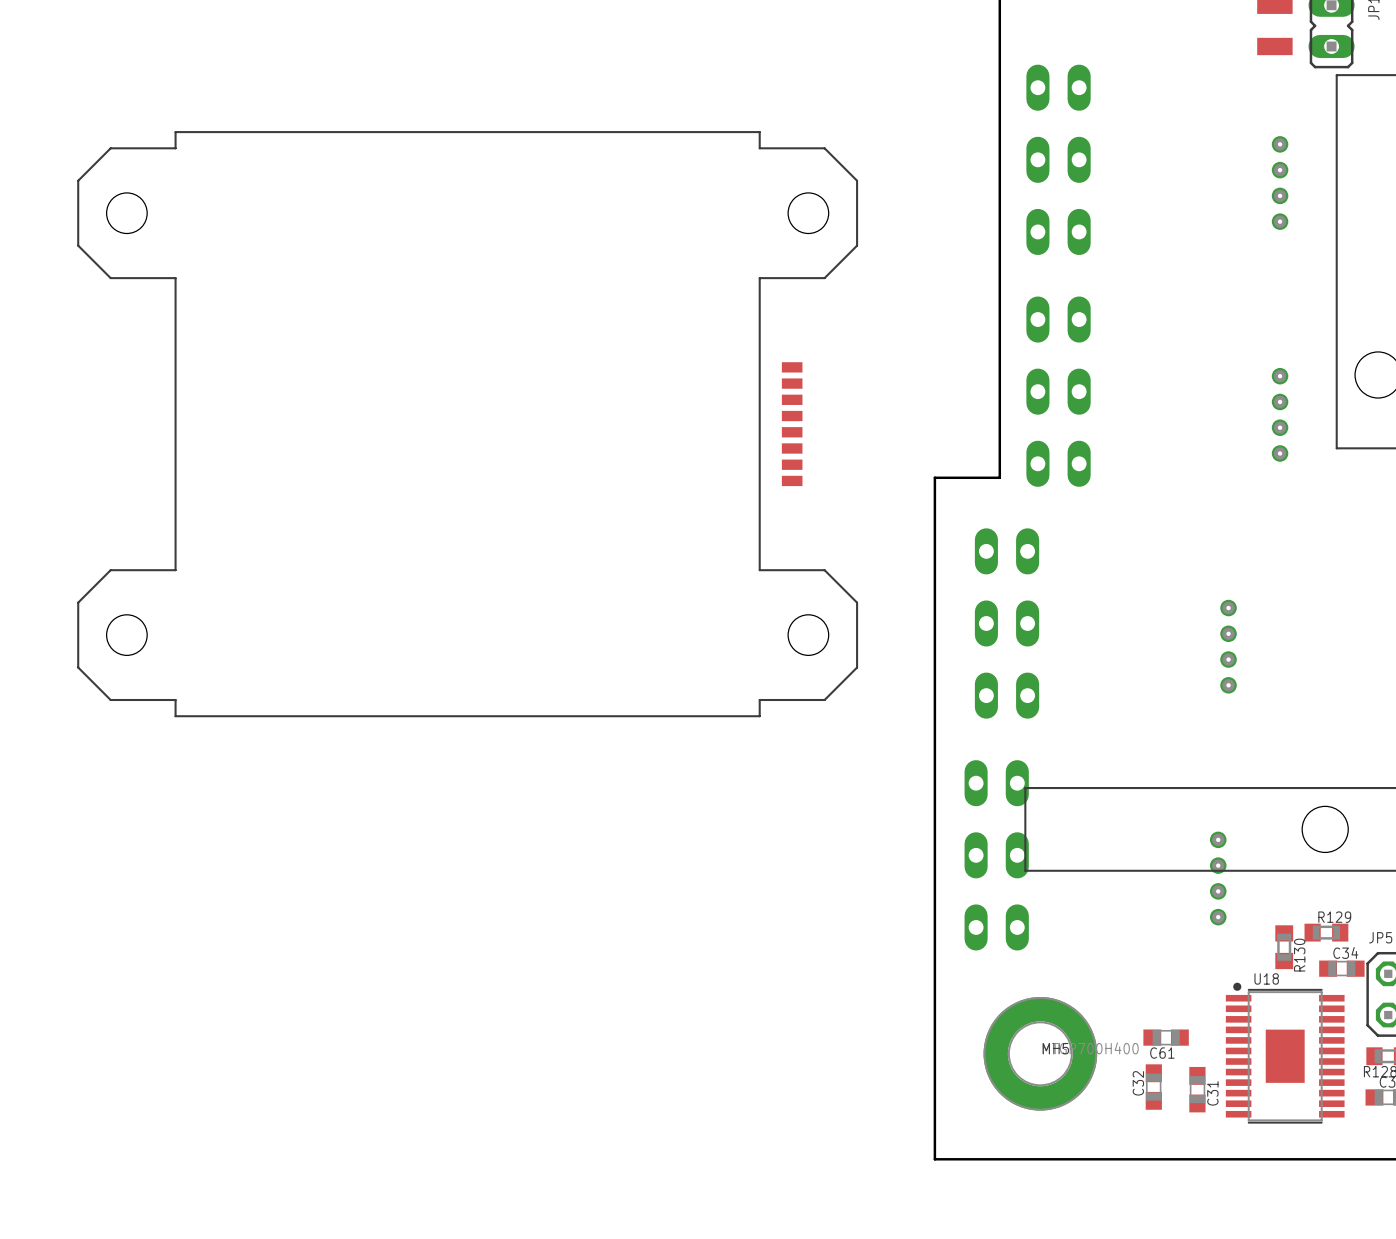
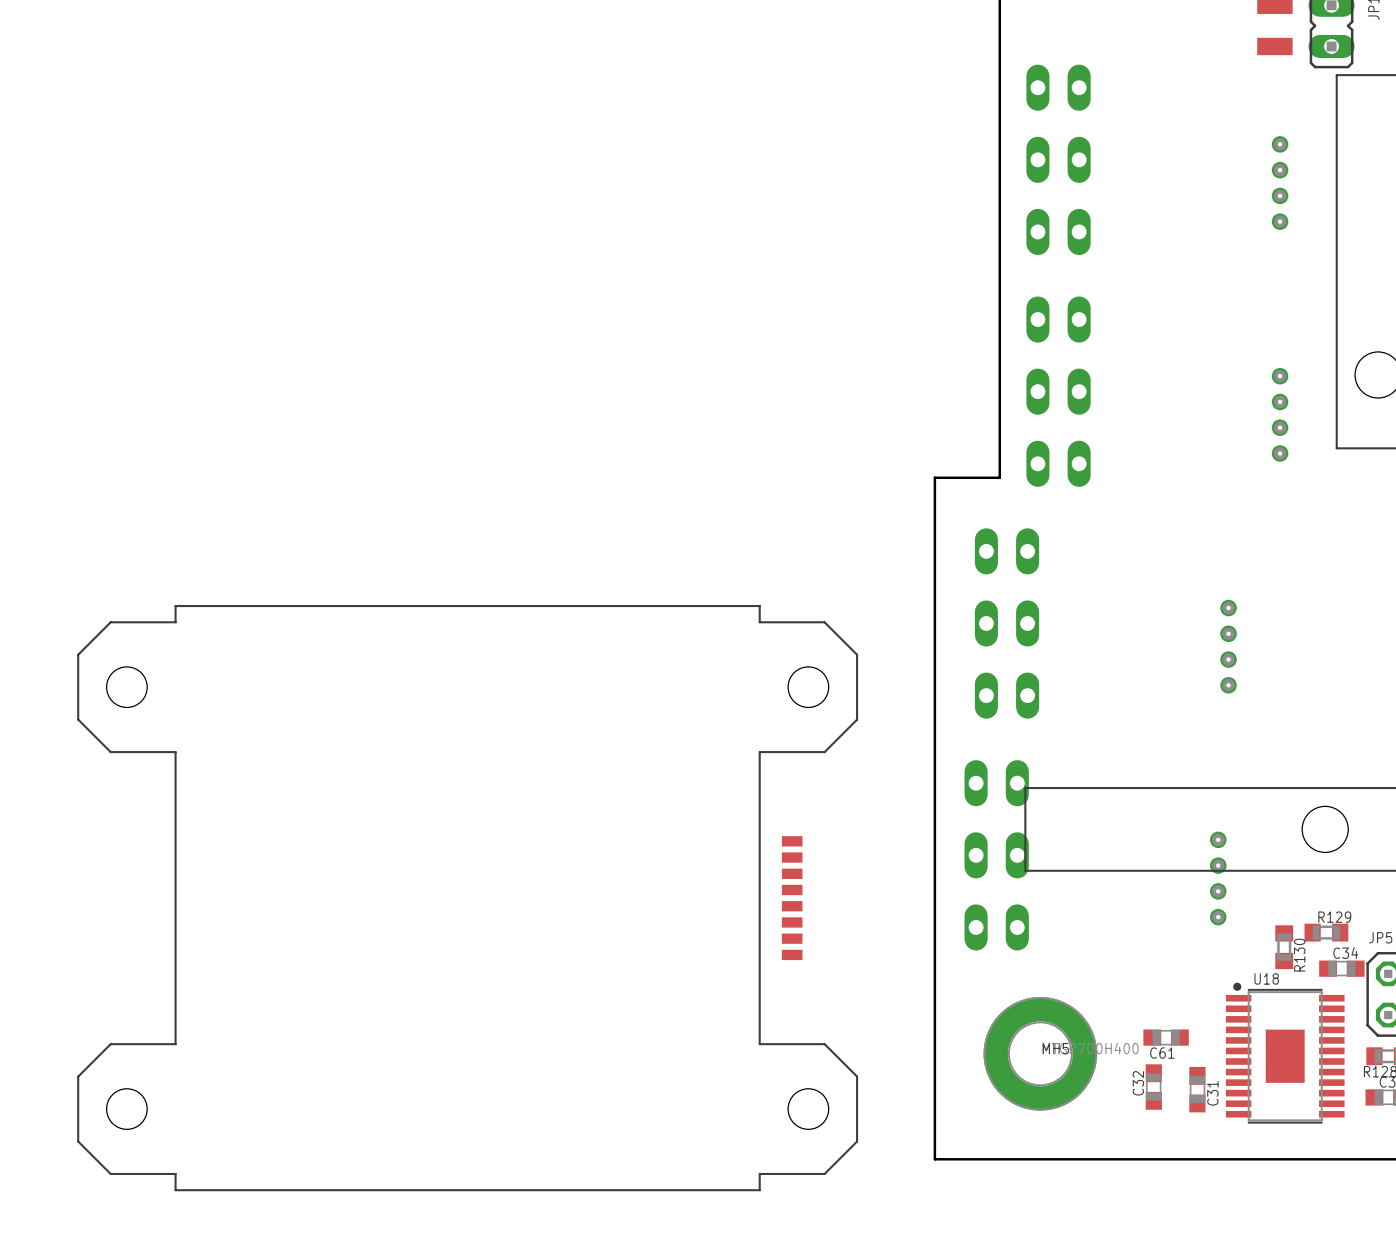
part: (467, 424) -> none
part: none -> (467, 898)

